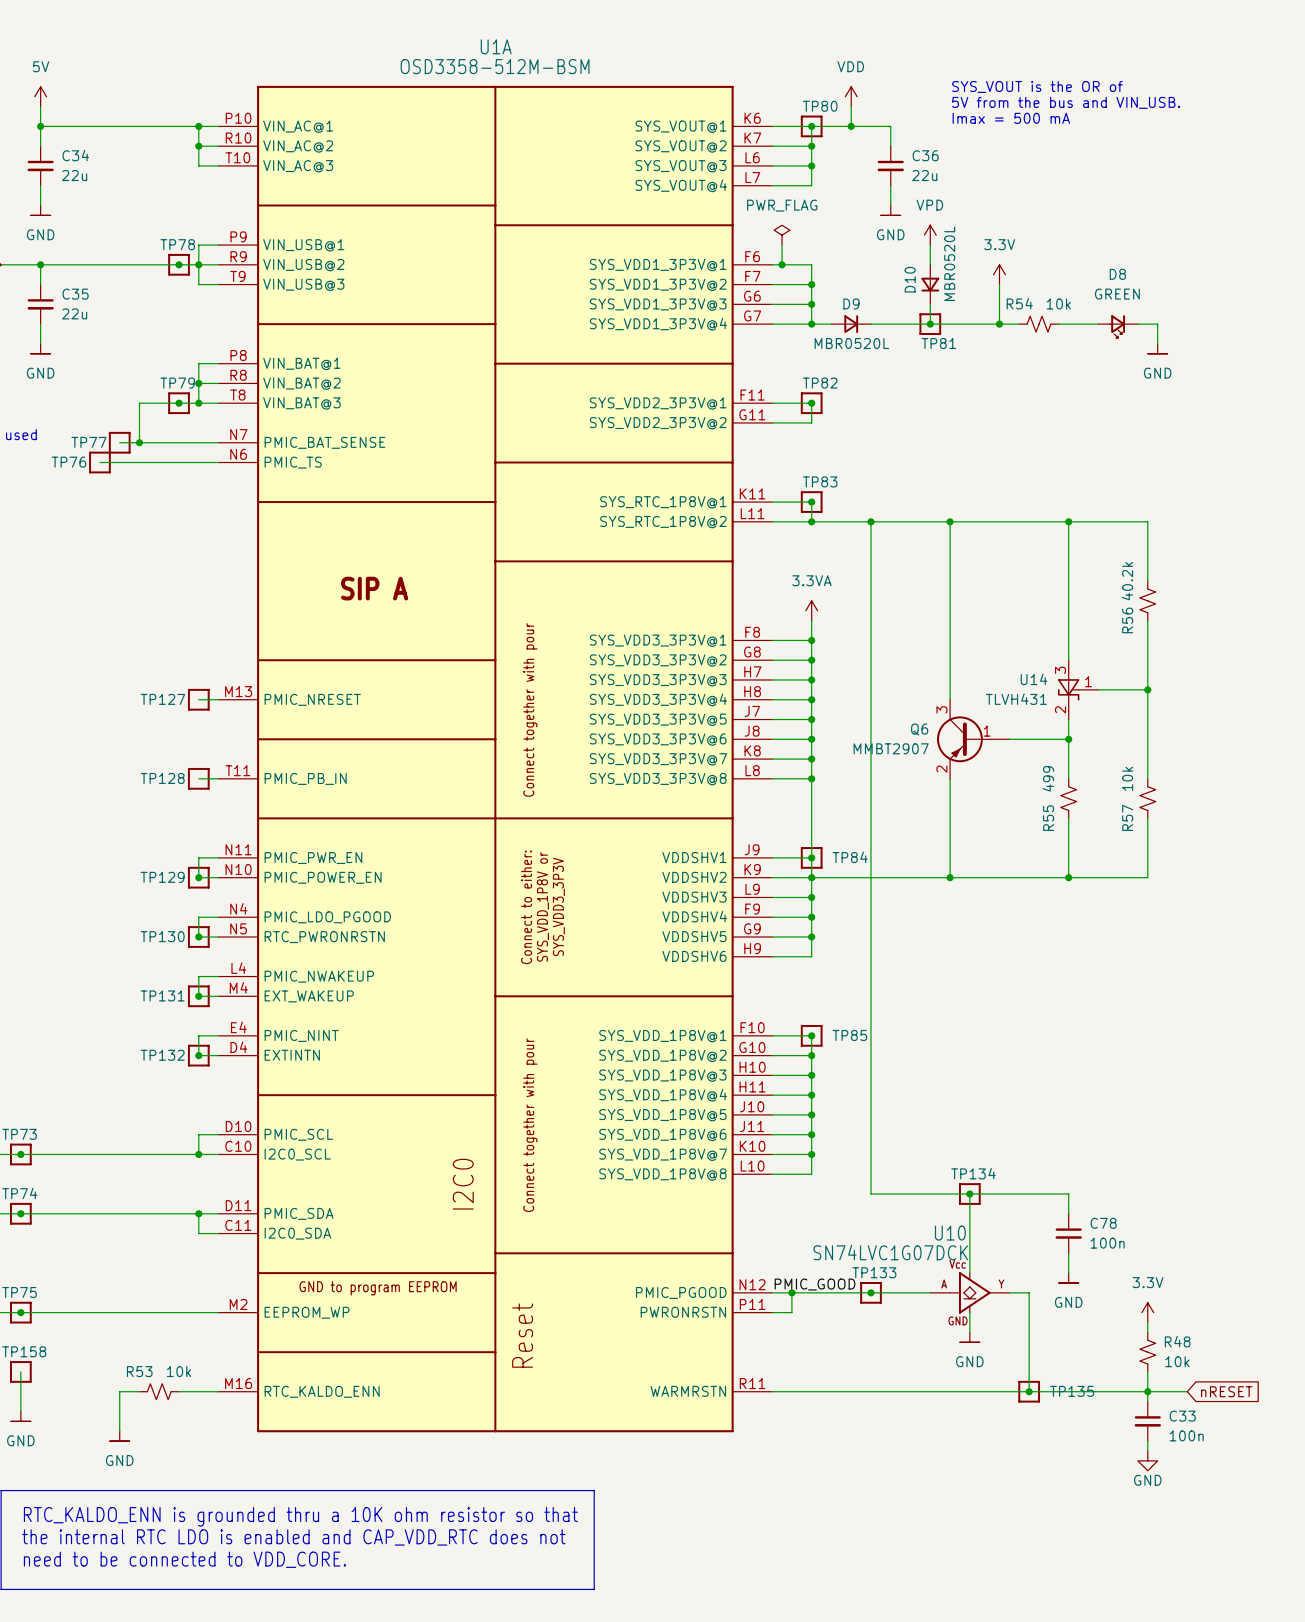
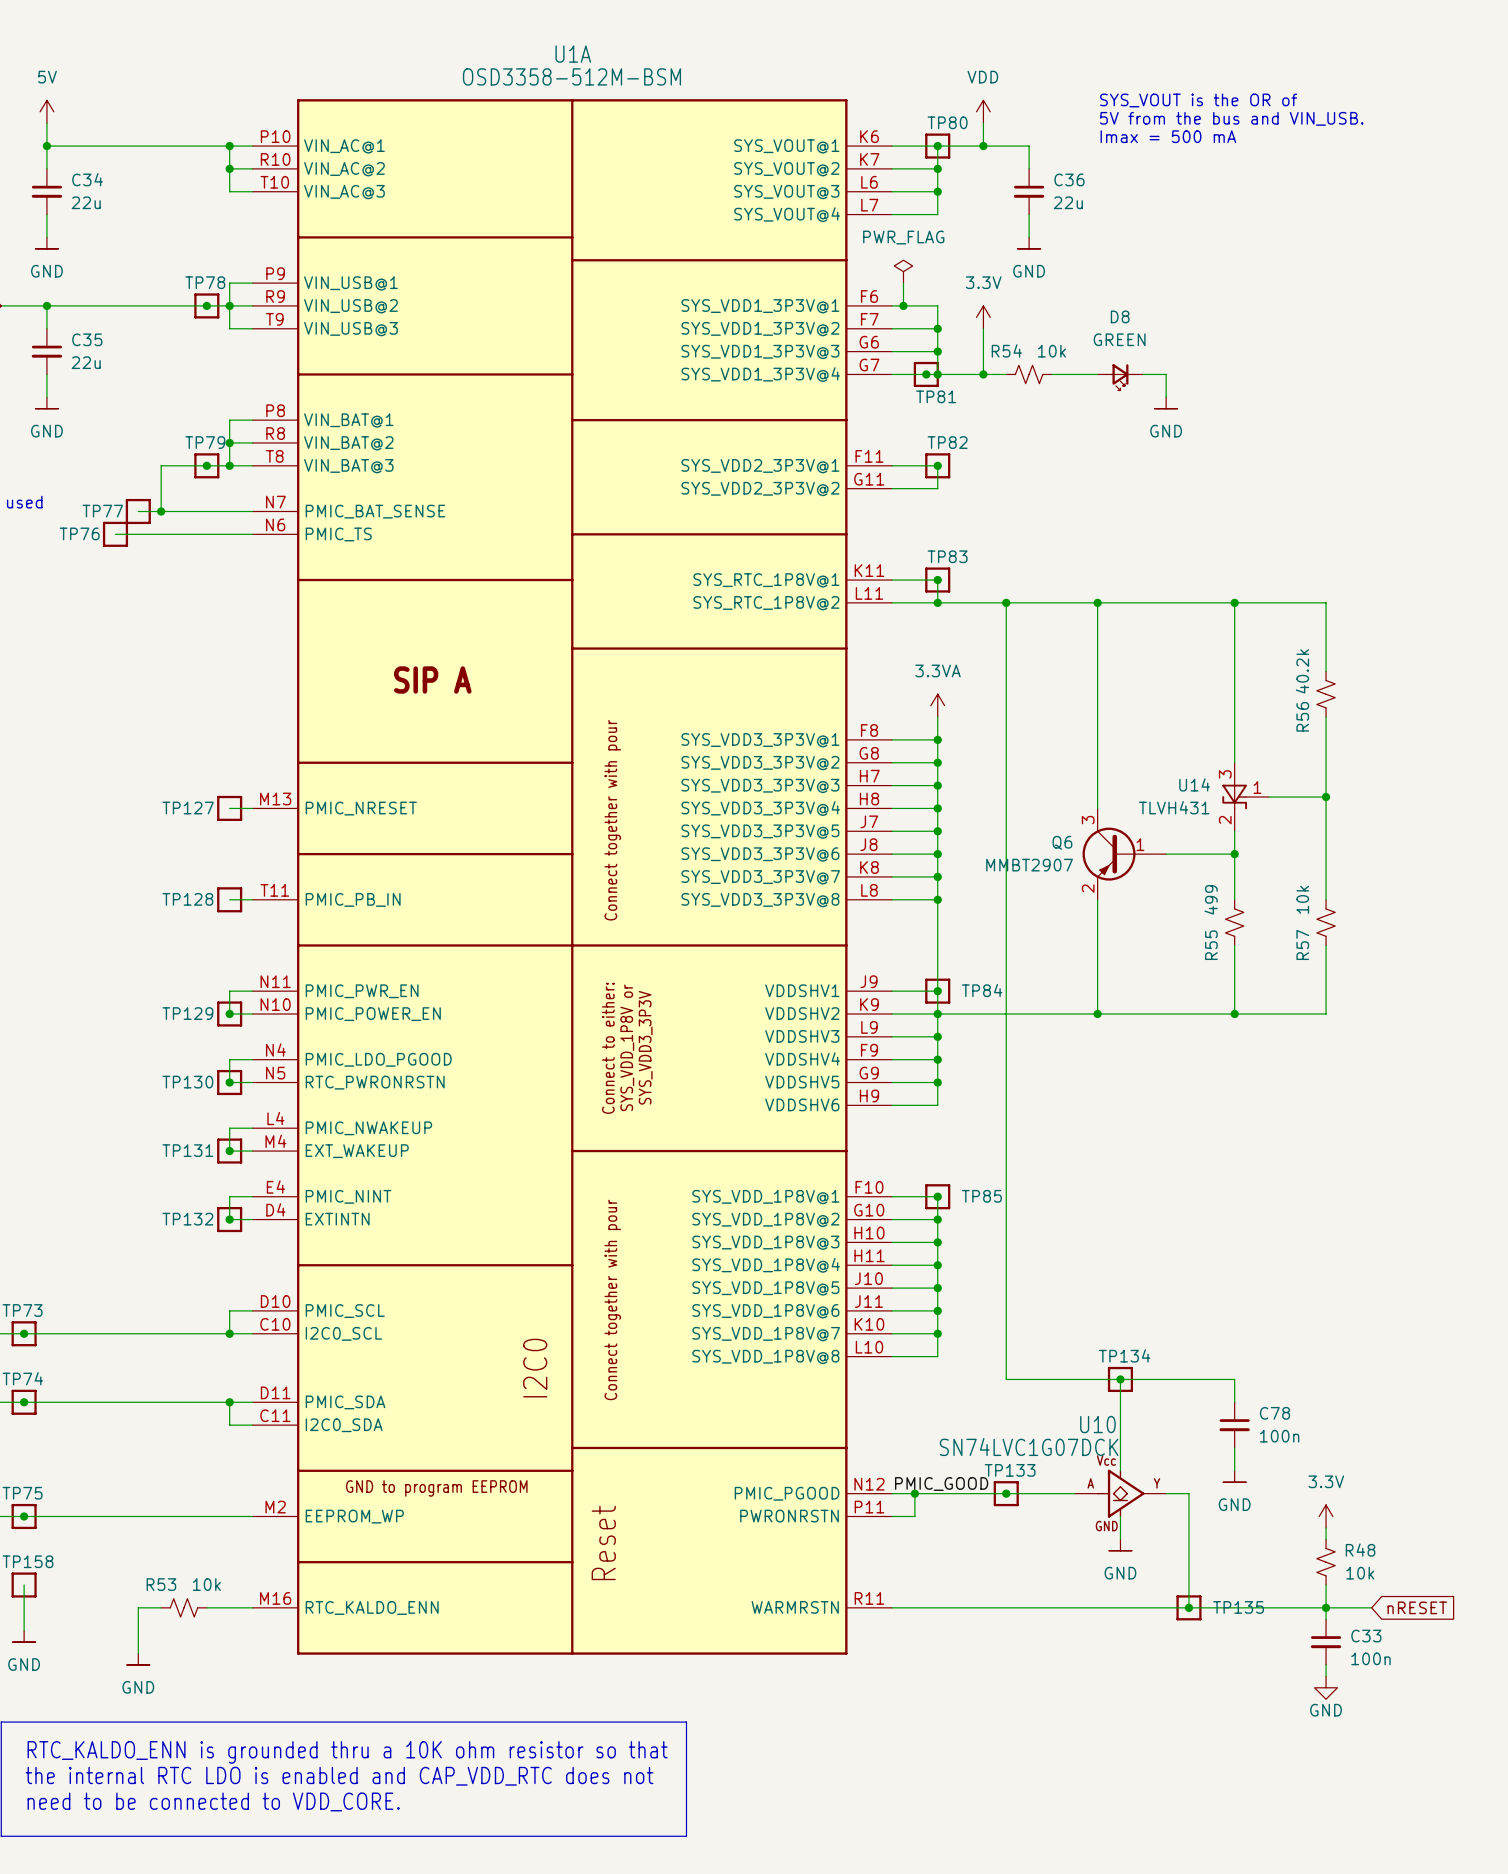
power symbol: VPD (930, 235) -> none
wire: (930, 245) (930, 264) -> none
power symbol position: 3.3V (999, 274) -> 3.3V (983, 317)
D10: MBR0520L (930, 284) -> none
wire: (999, 284) (999, 324) -> (983, 328) (983, 374)
wire: (930, 304) (930, 324) -> none
junction: none -> (926, 374)
junction: none -> (983, 374)
D9: MBR0520L (851, 324) -> none
junction: (930, 324) -> none
TP81 position: (930, 324) -> (926, 374)
junction: (999, 324) -> none
wire: (1009, 324) (1019, 324) -> (1166, 374) (1166, 397)
R54 position: (1039, 324) -> (1029, 374)
wire: (1058, 324) (1098, 324) -> none
wire: (1137, 324) (1157, 324) (1157, 343) -> none
D8 position: (1118, 326) -> (1120, 377)
power symbol position: GND (1157, 348) -> GND (1166, 403)

